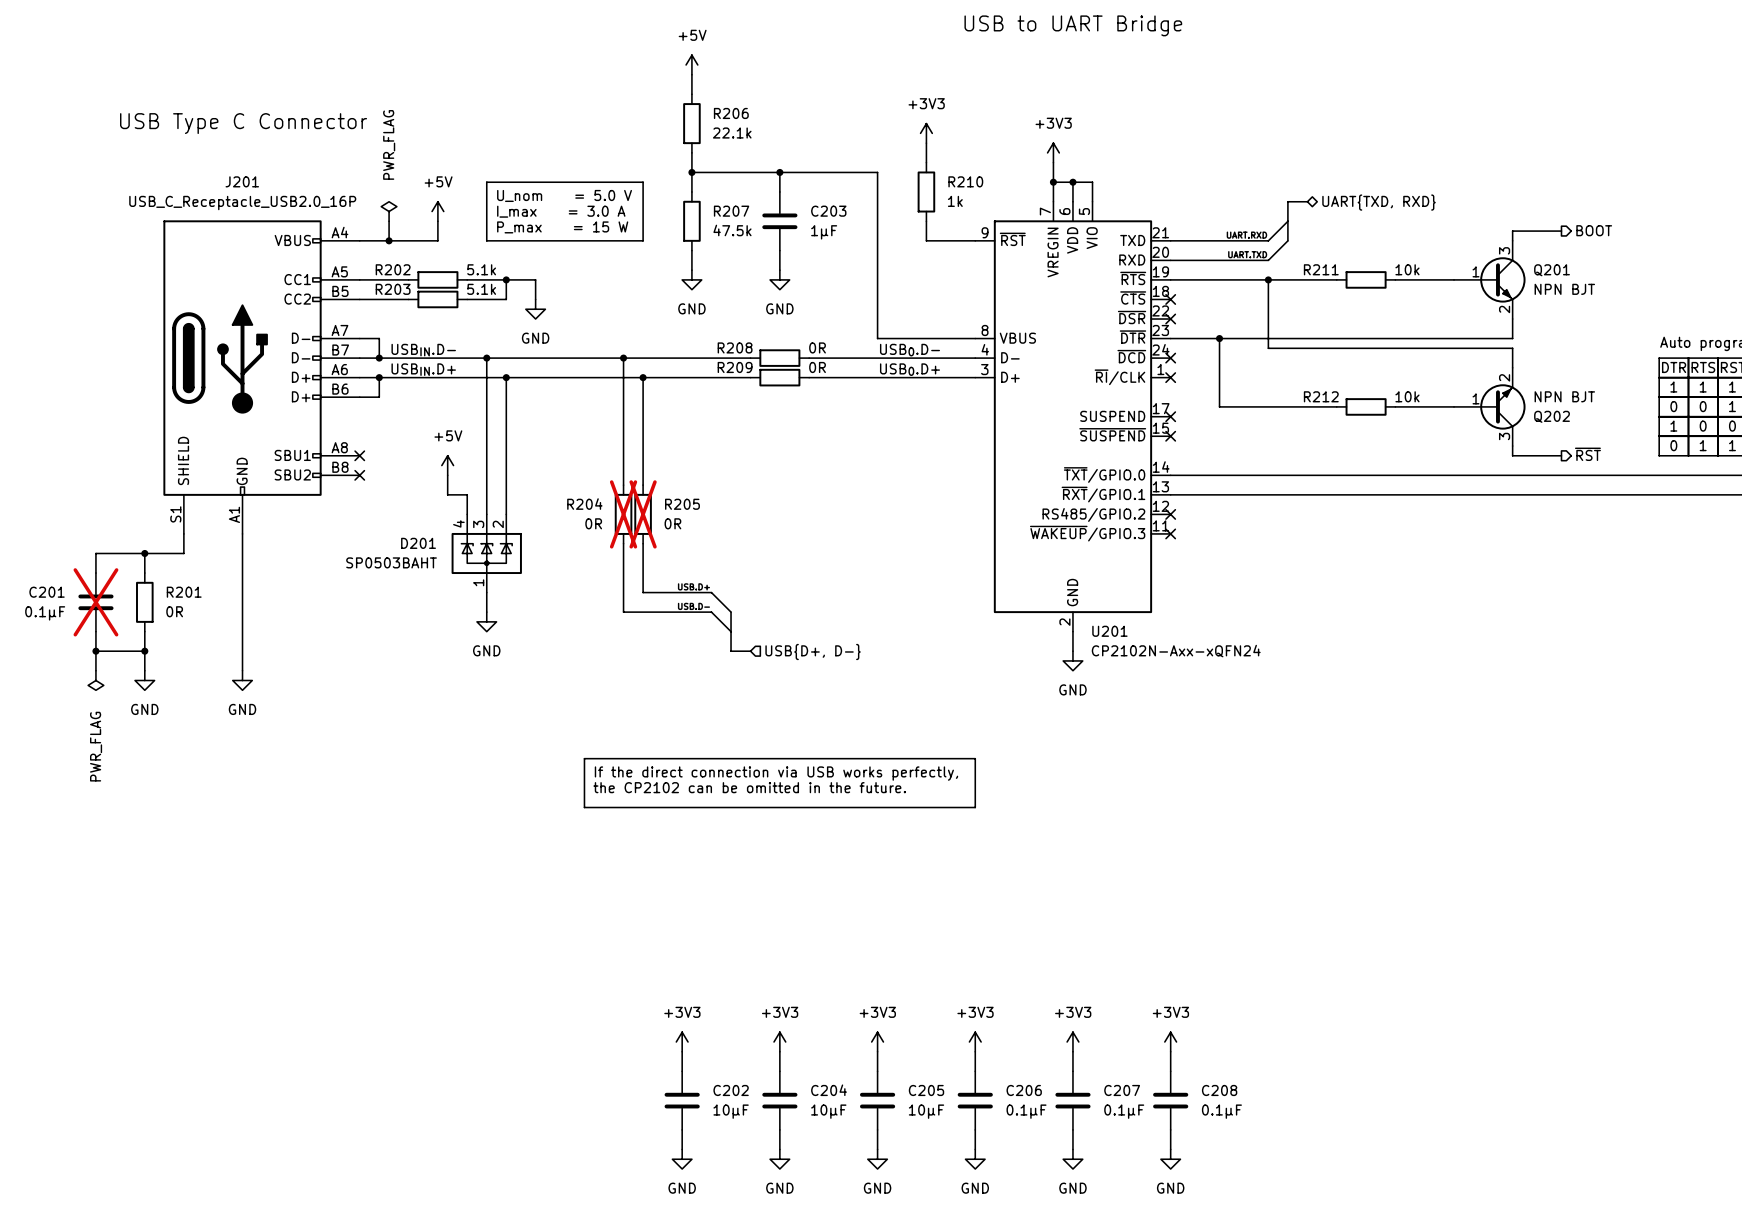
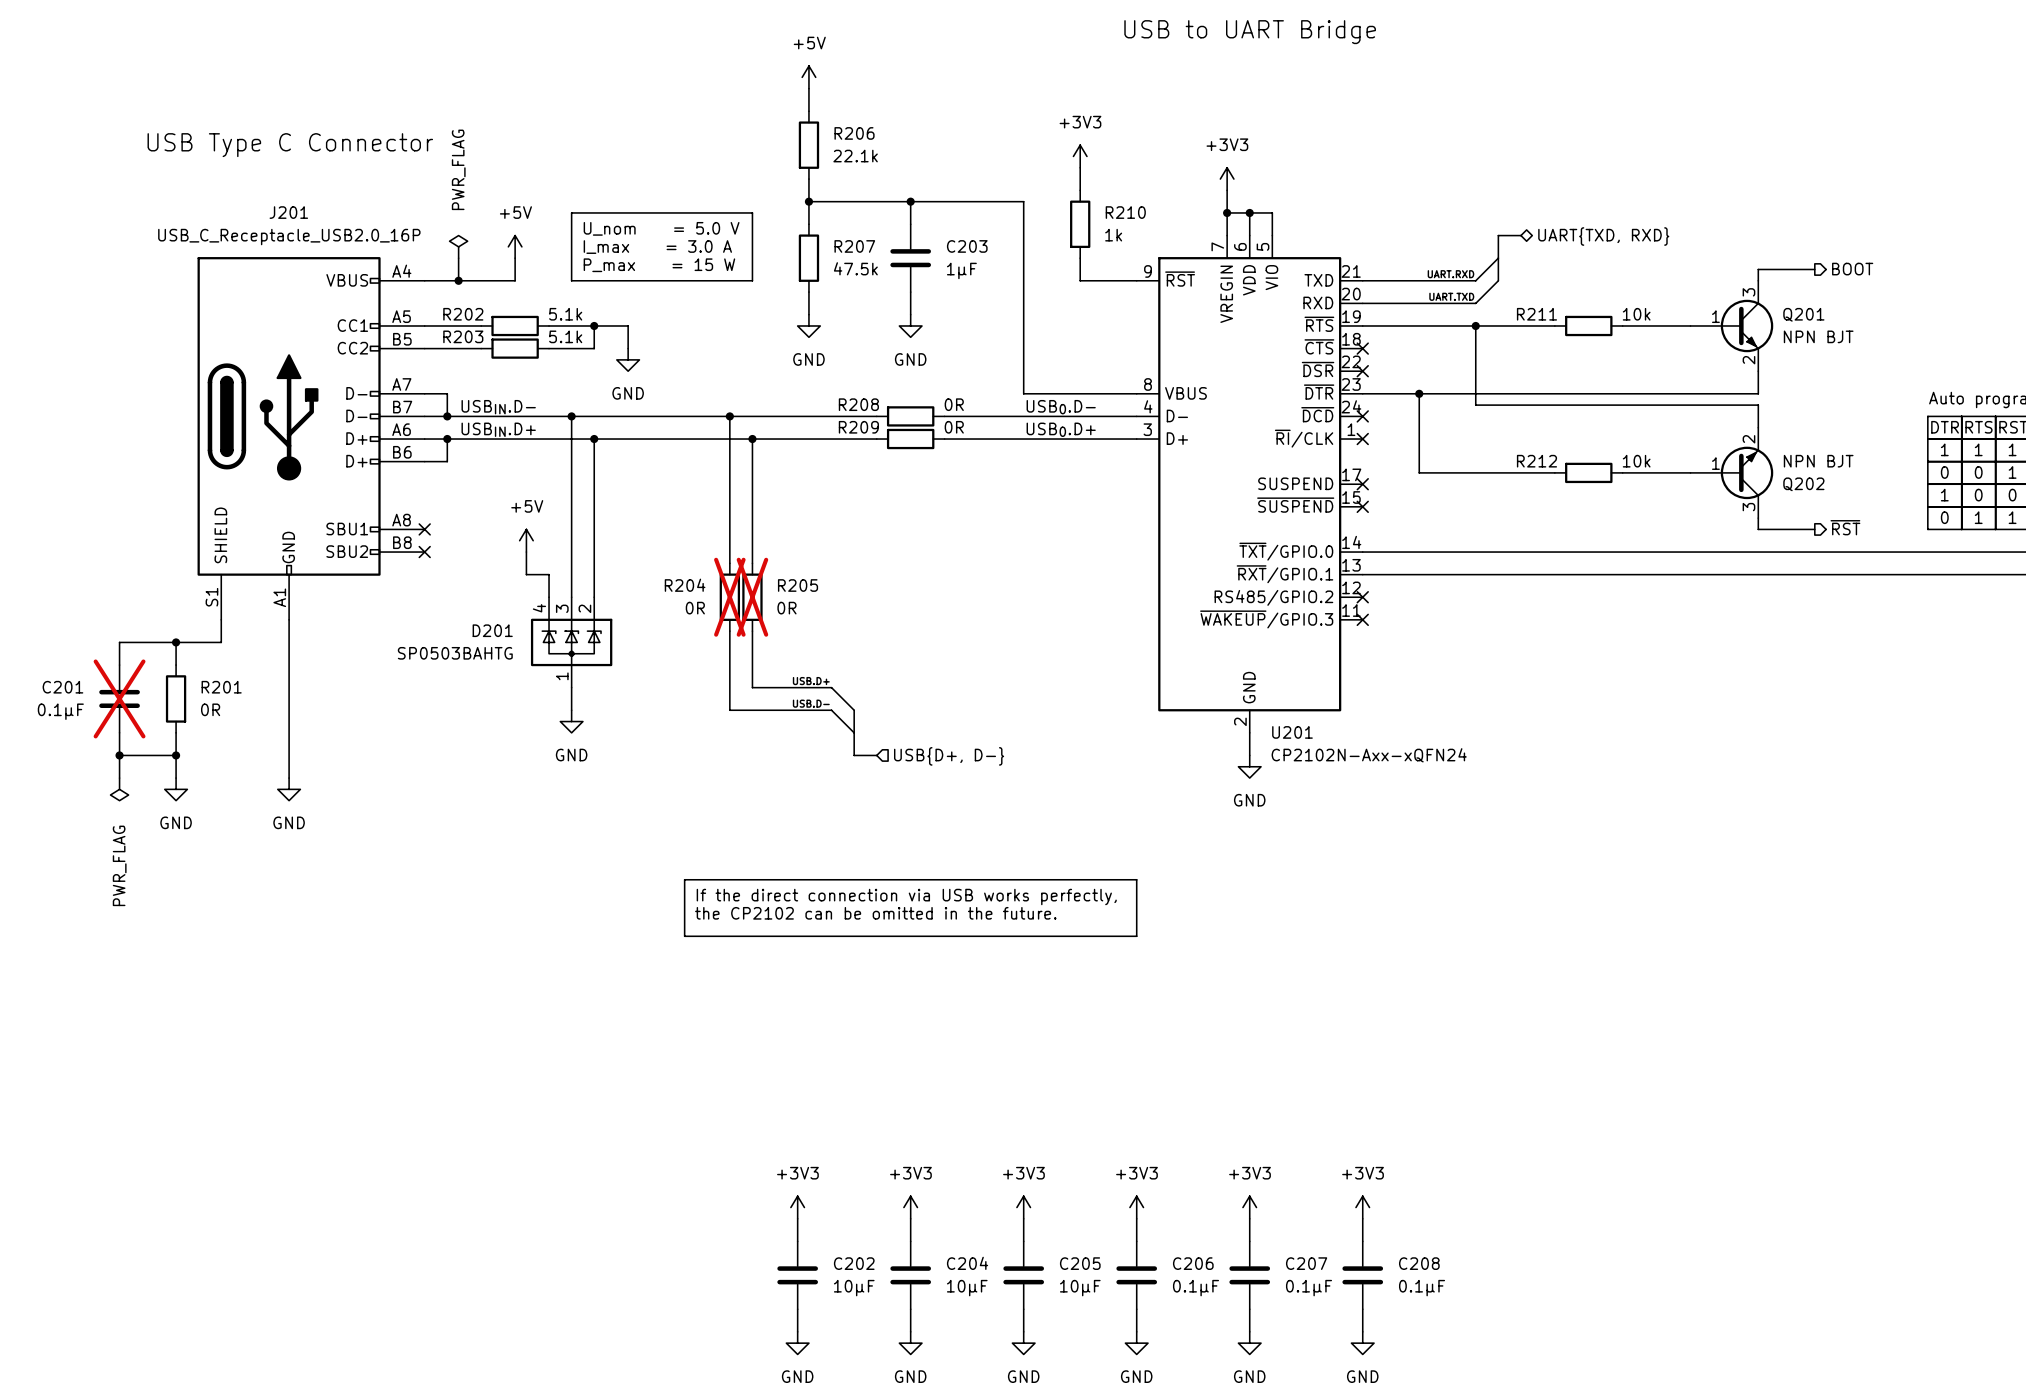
D201 value: SP0503BAHT (391, 562) -> SP0503BAHTG (455, 653)

